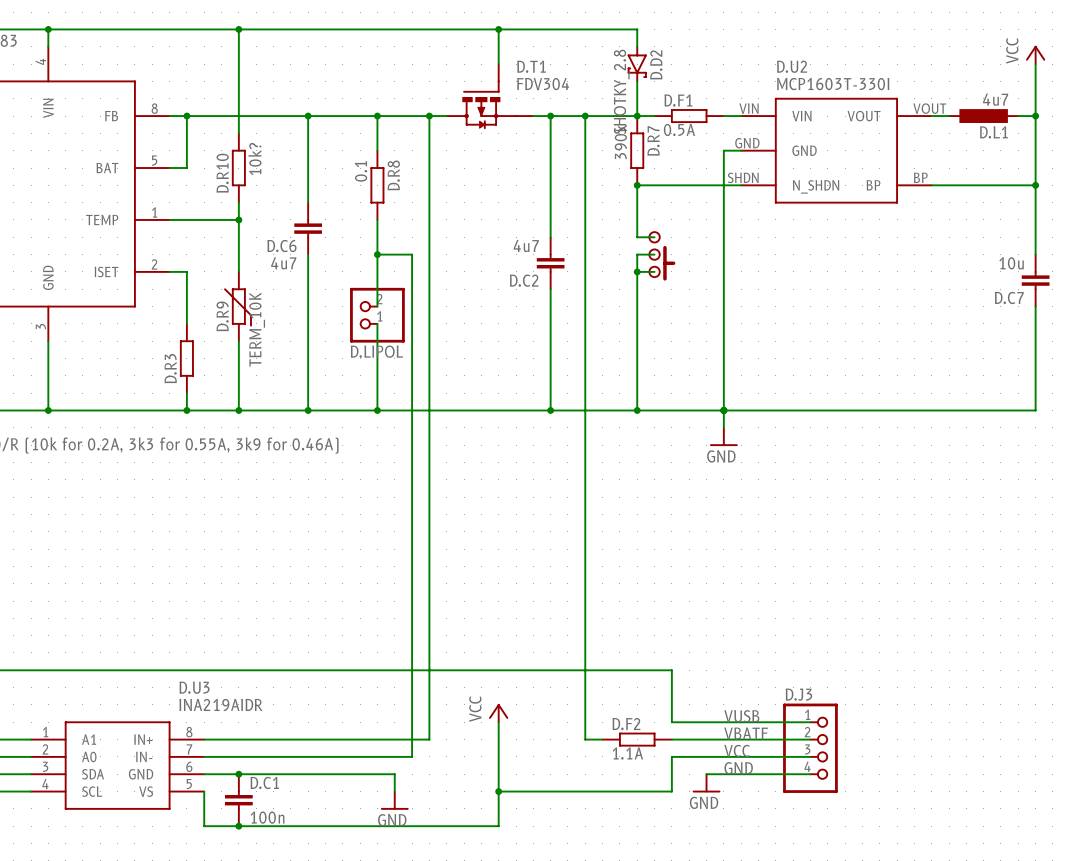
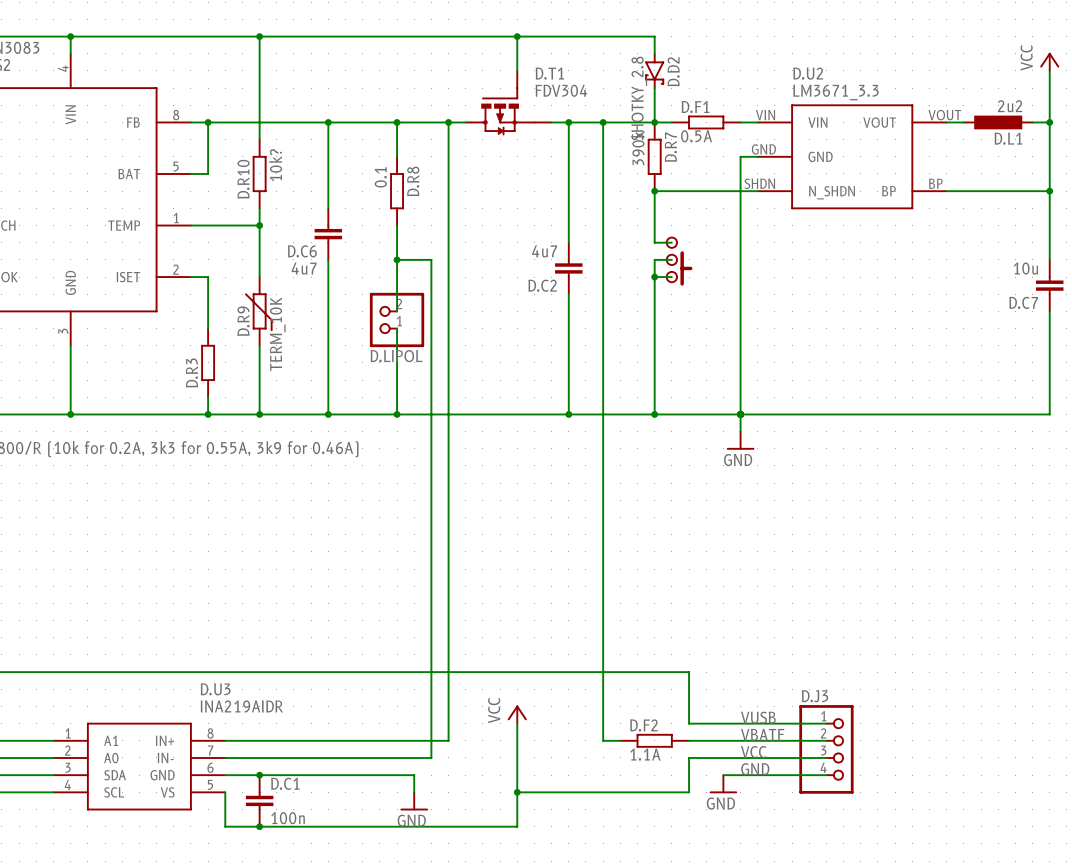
D.U2 value: MCP1603T-330I (833, 84) -> LM3671_3.3 (835, 92)
D.L1 value: 4u7 (995, 99) -> 2u2 (1010, 106)

